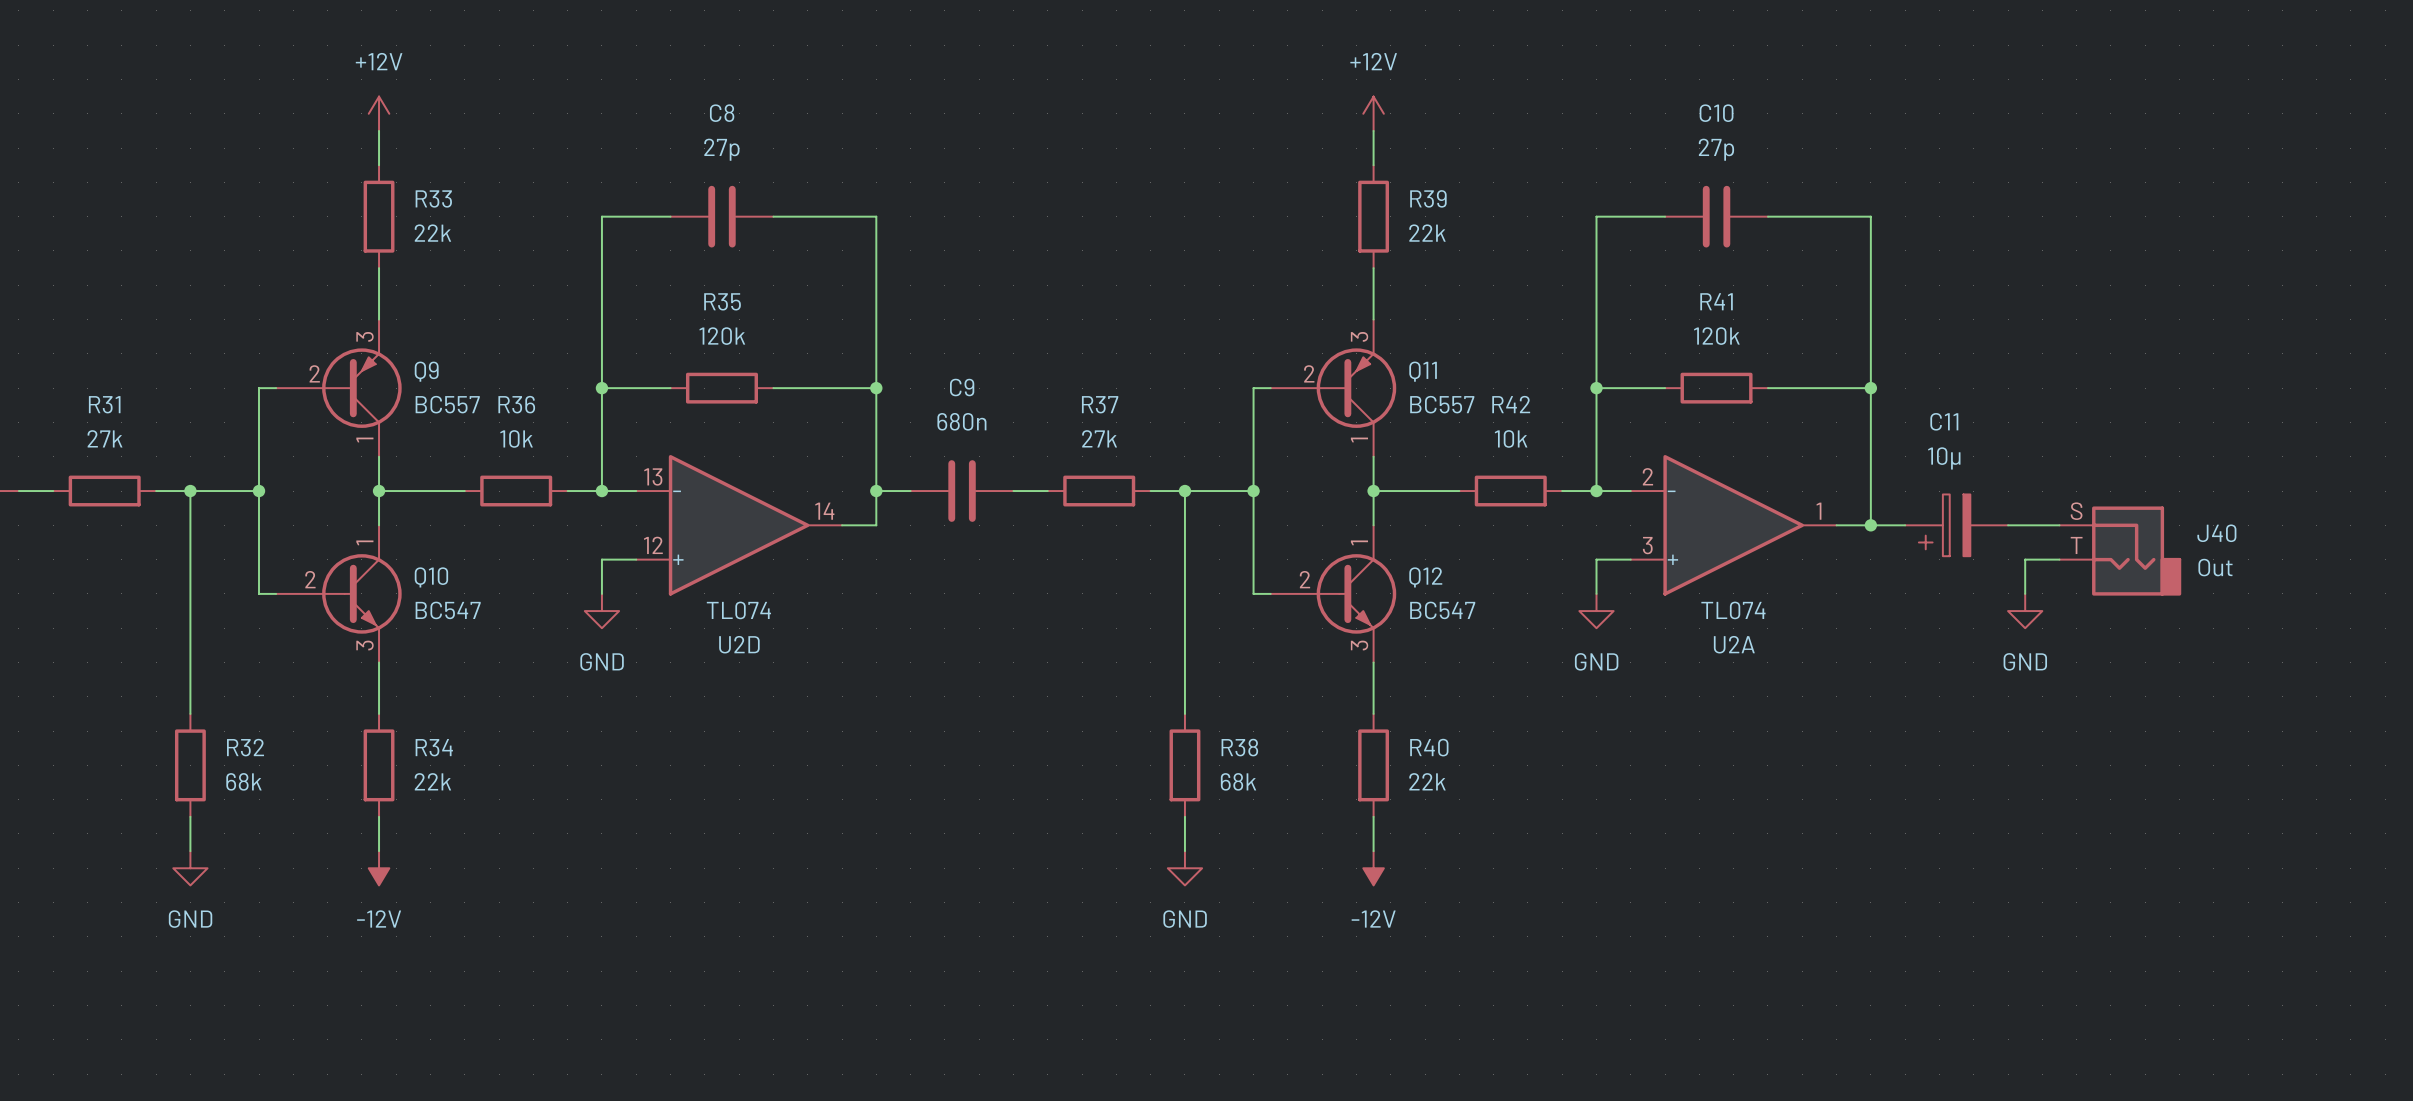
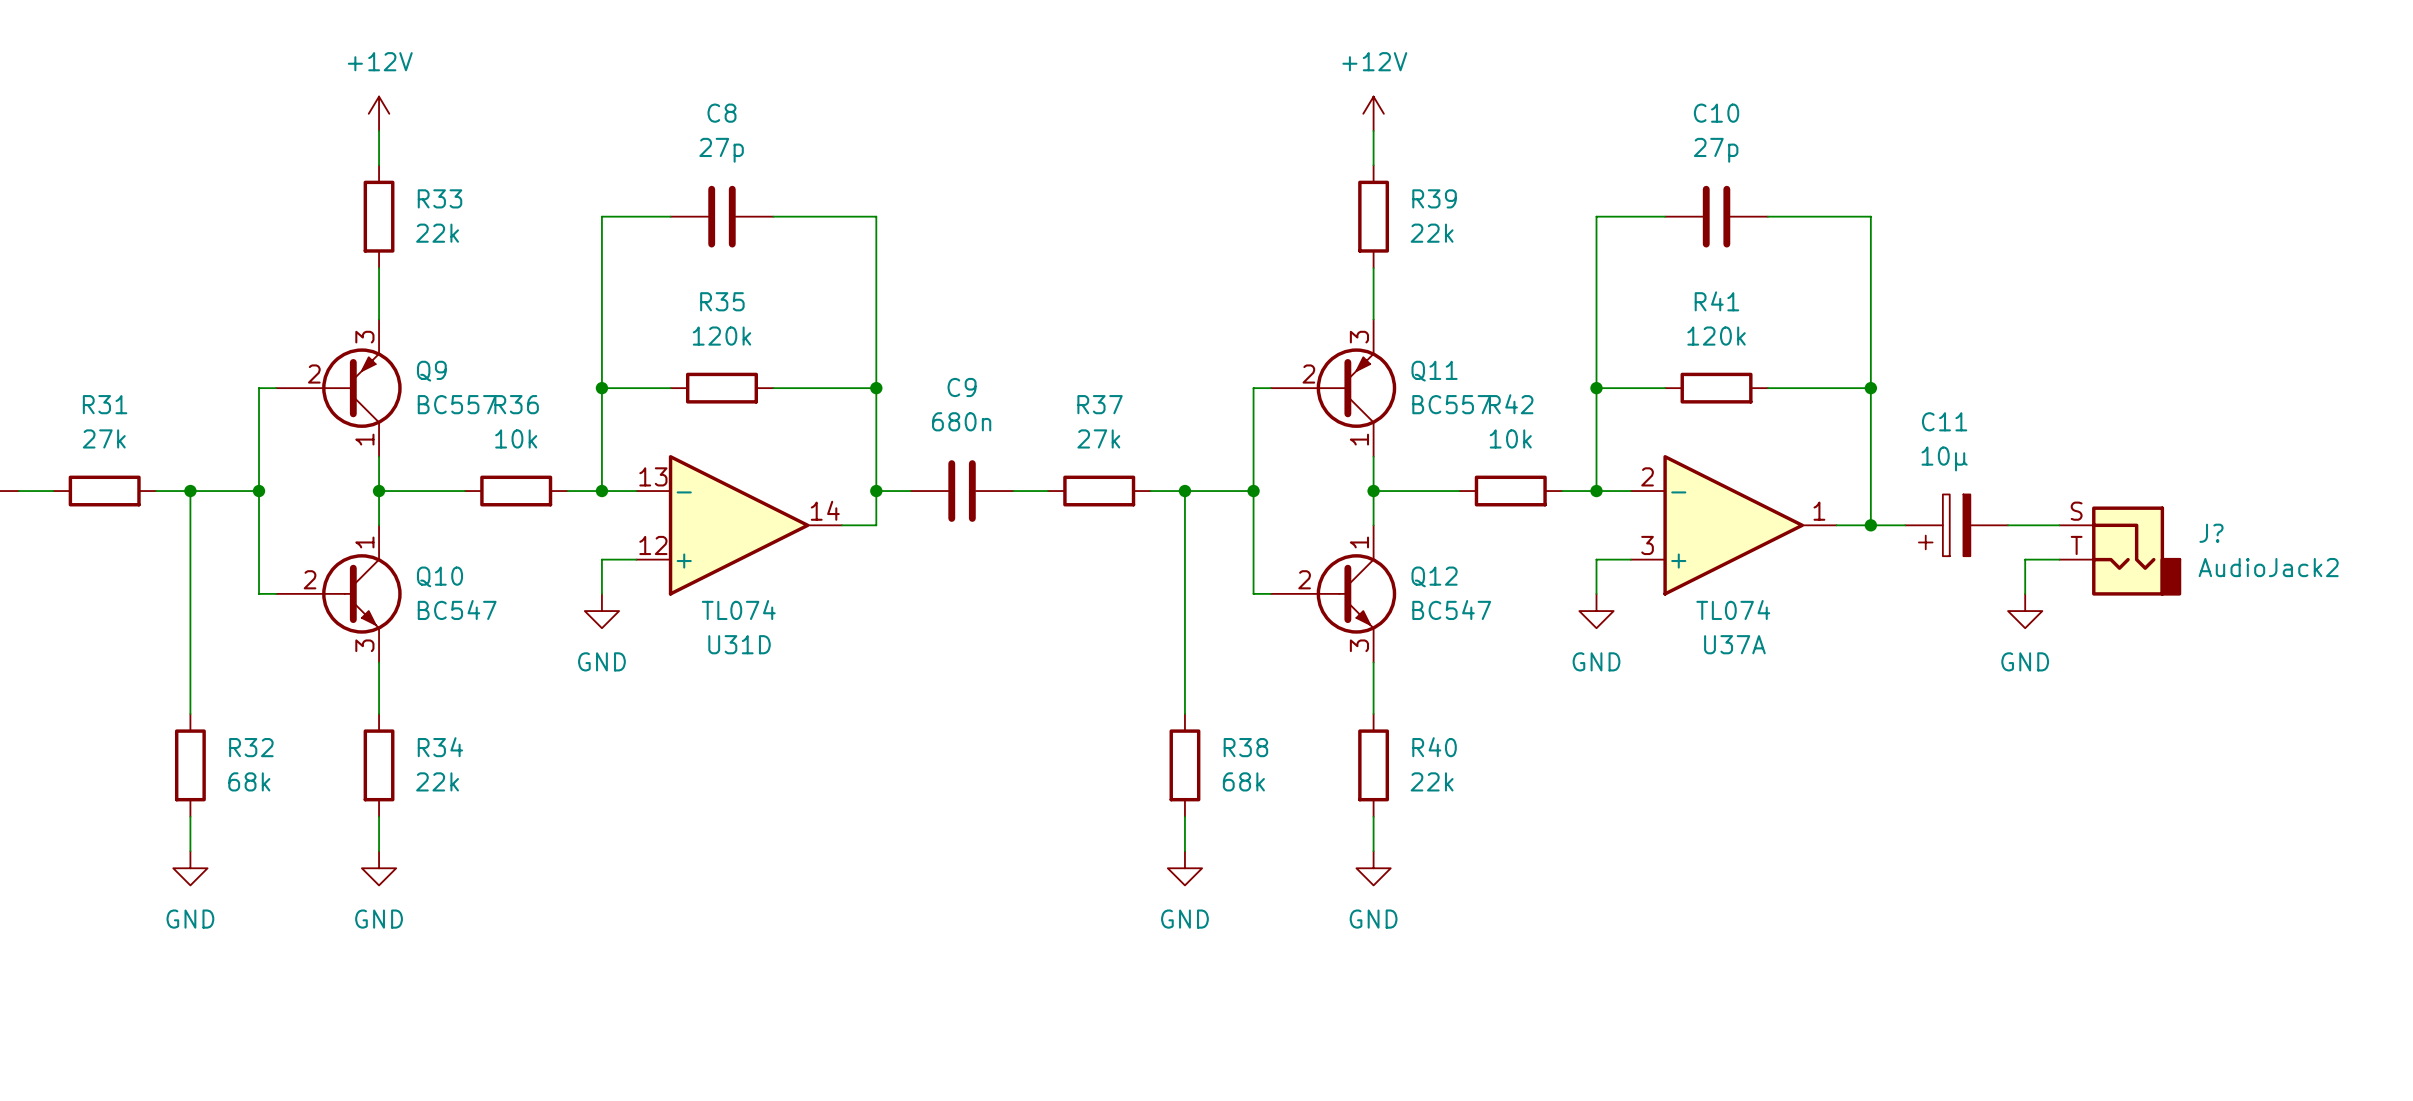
J40 name: J40 (2216, 533) -> J? (2211, 533)
J40 value: Out (2215, 567) -> AudioJack2 (2268, 567)
U2D name: U2D (739, 644) -> U31D (739, 644)
U2A name: U2A (1734, 644) -> U37A (1734, 644)
power symbol: -12V (379, 868) -> GND (379, 868)
power symbol: -12V (1373, 868) -> GND (1373, 868)

